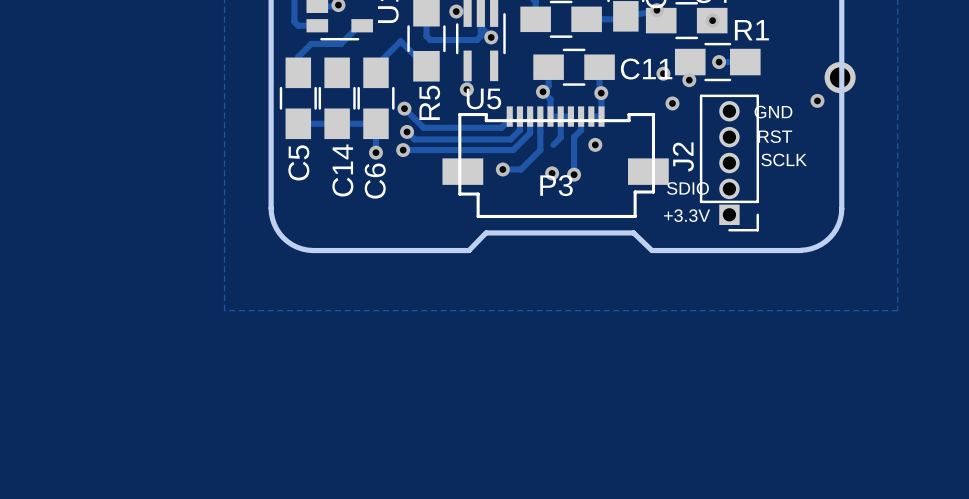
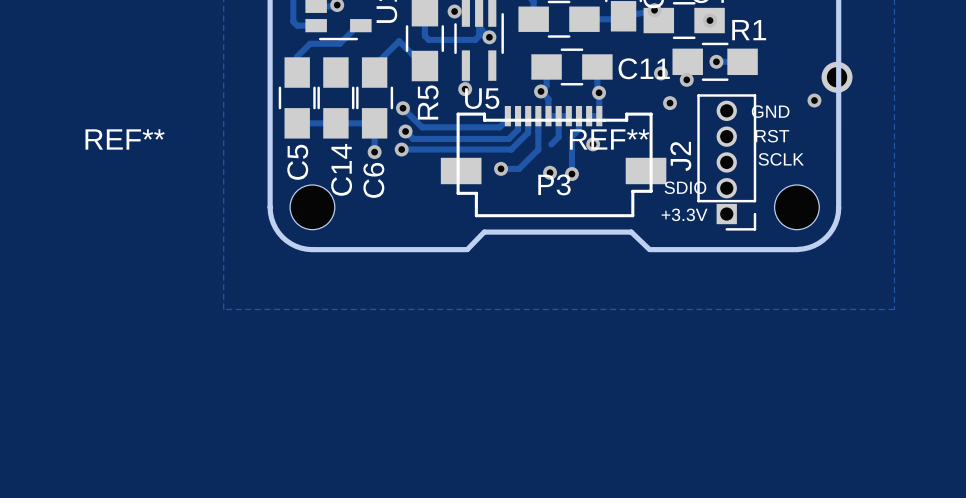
REF**: none -> (312, 207)
REF**: none -> (796, 207)

